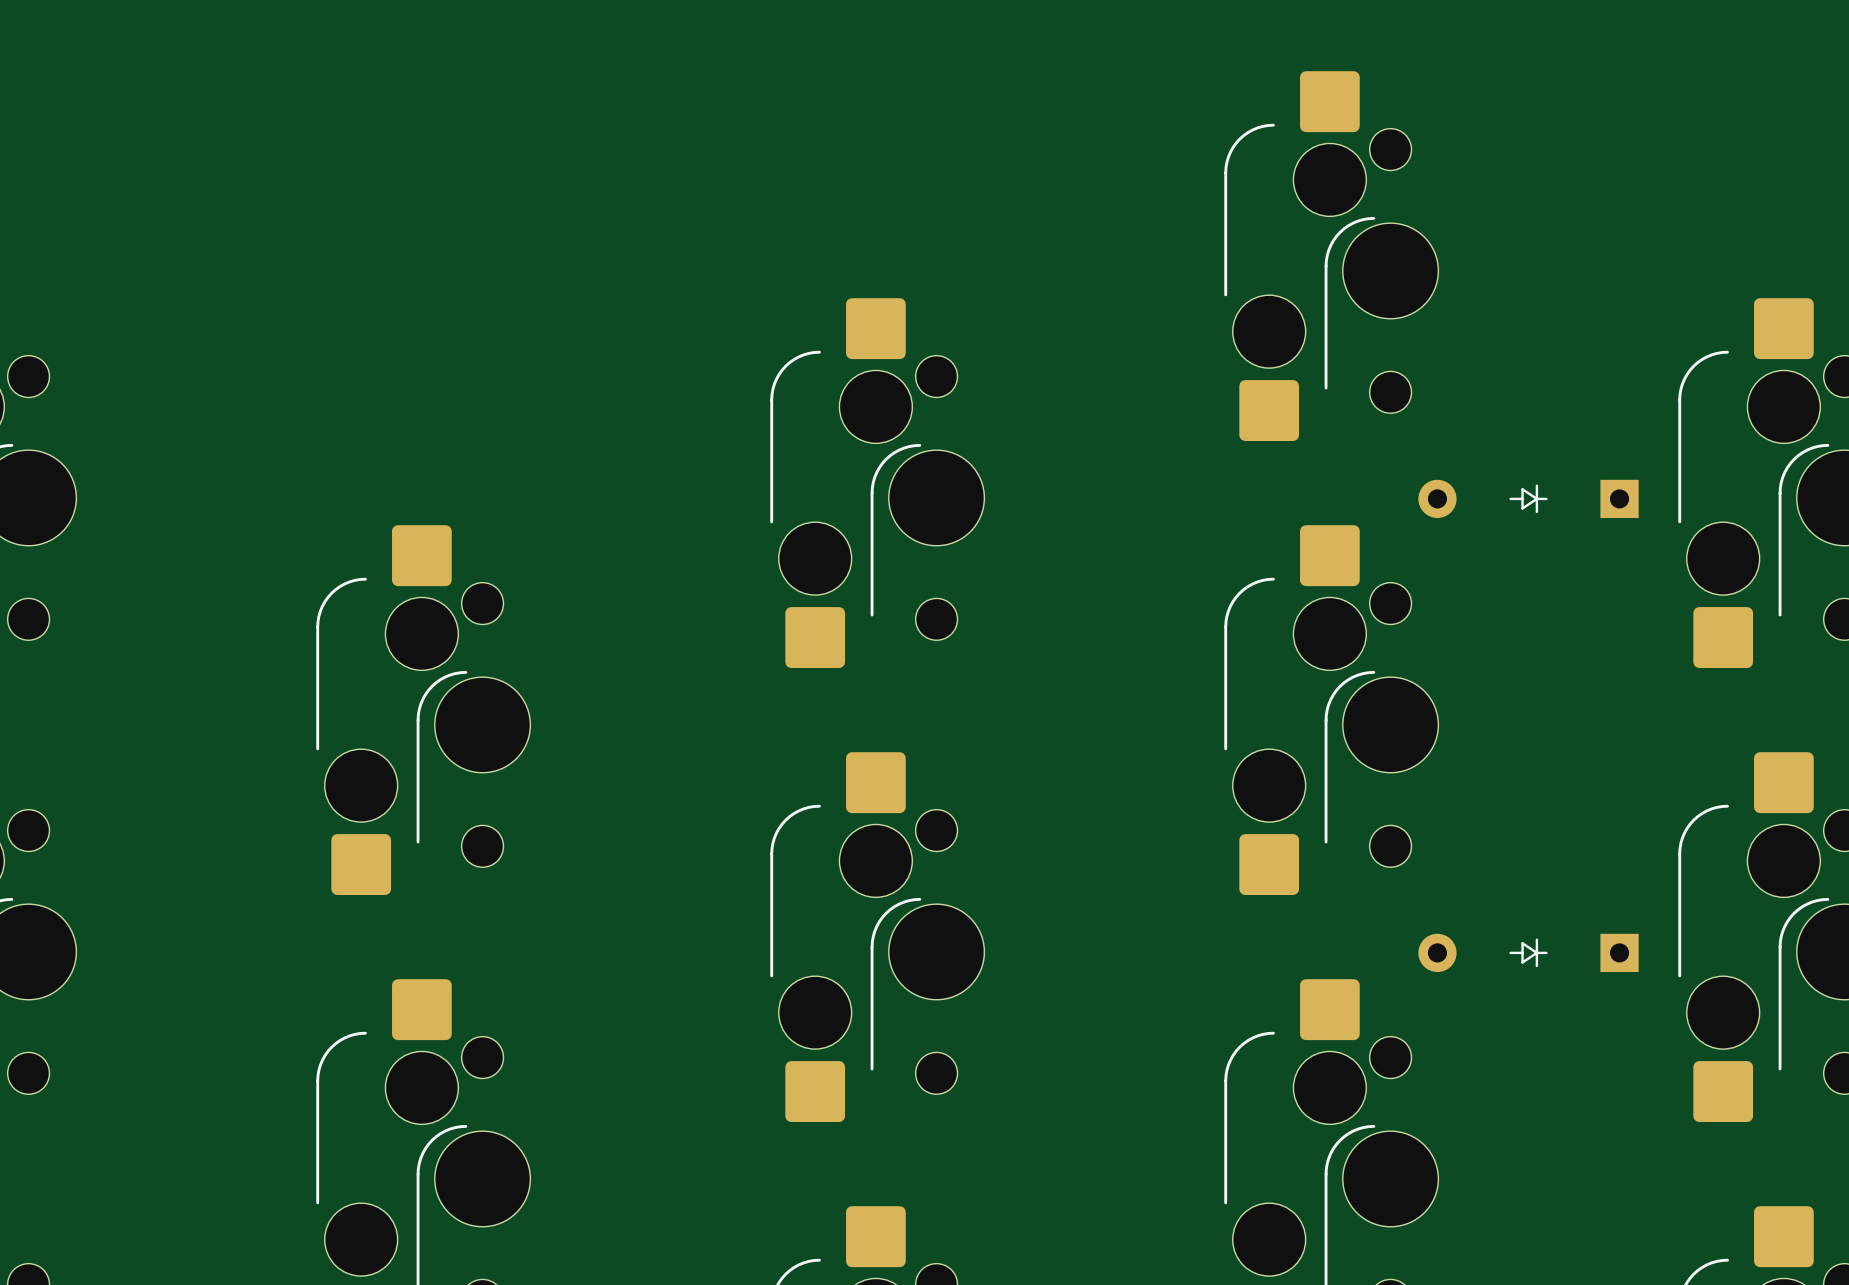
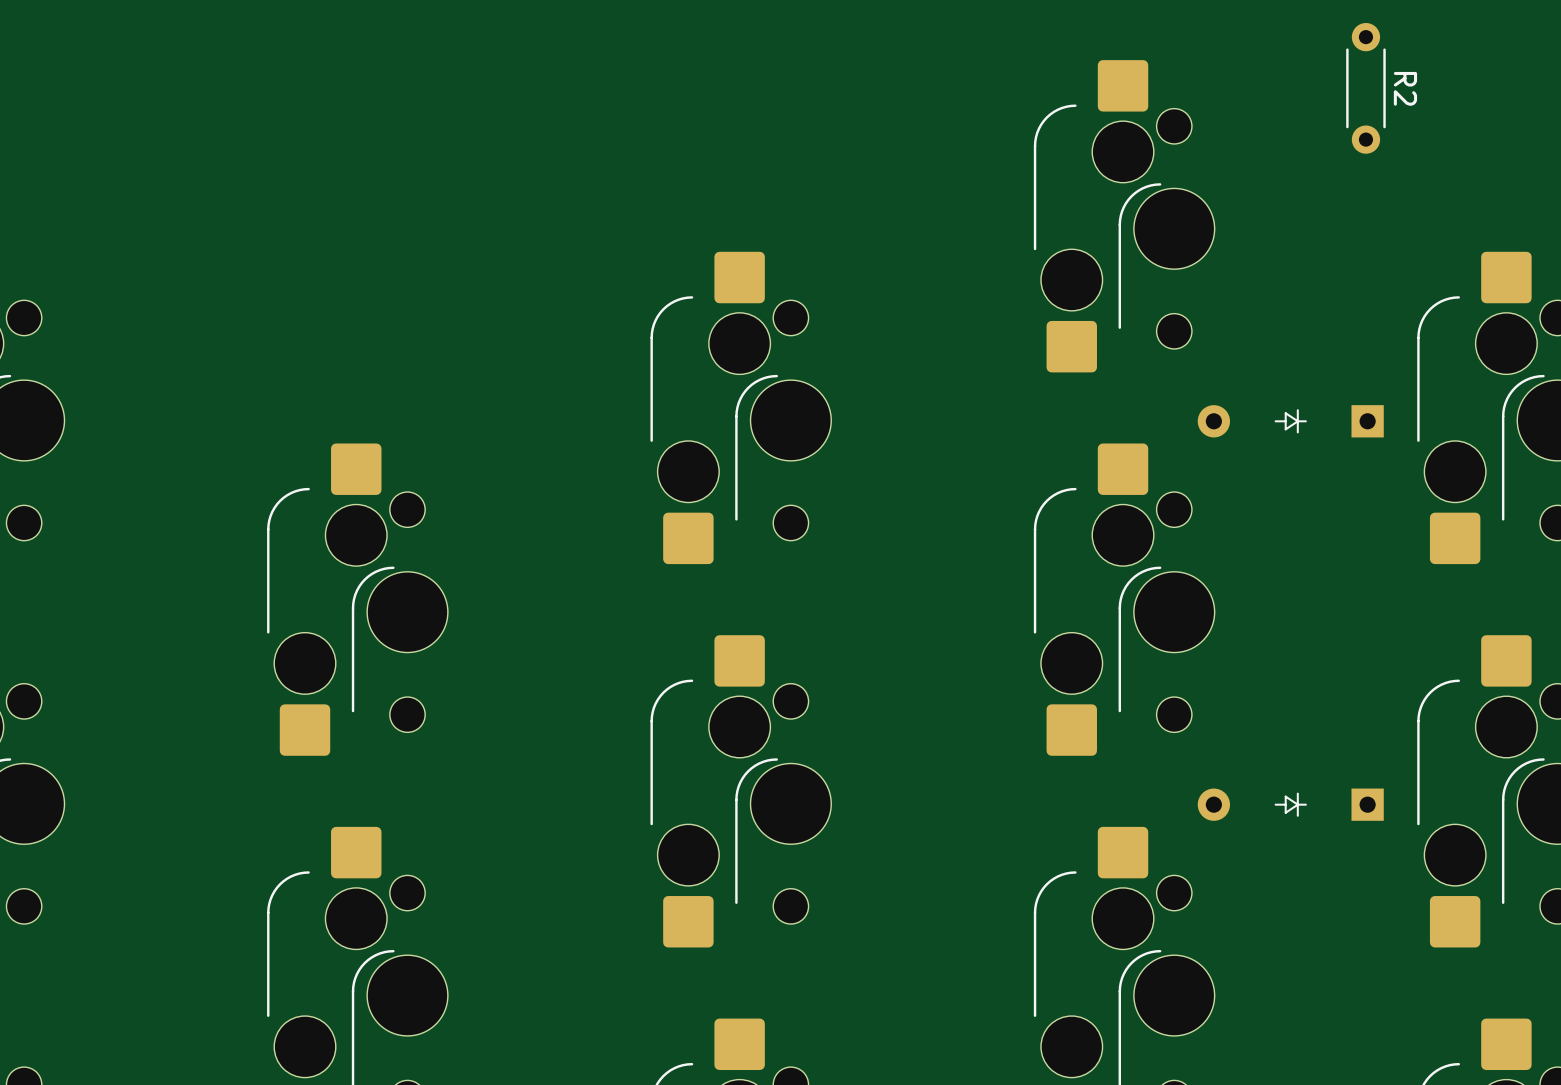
R2: none -> (1365, 88)

